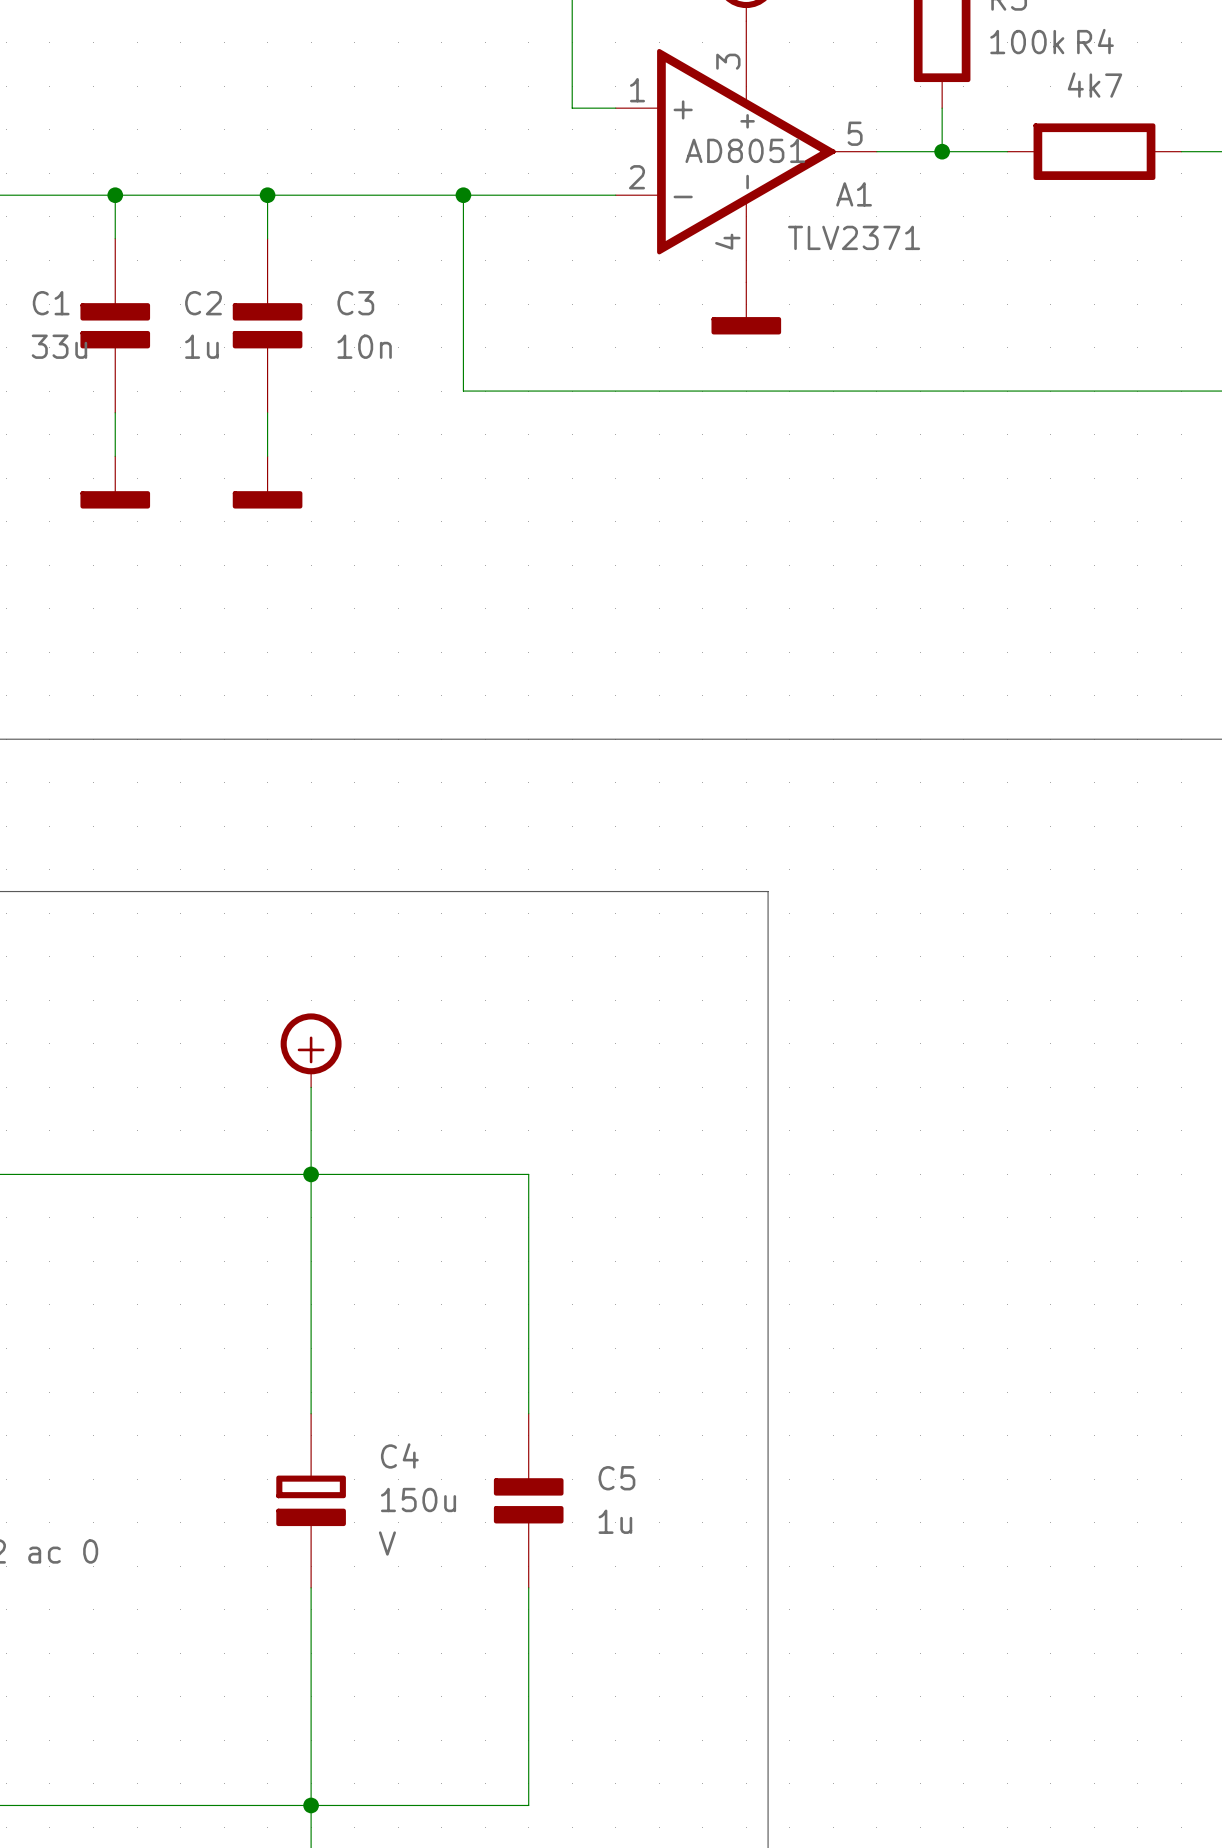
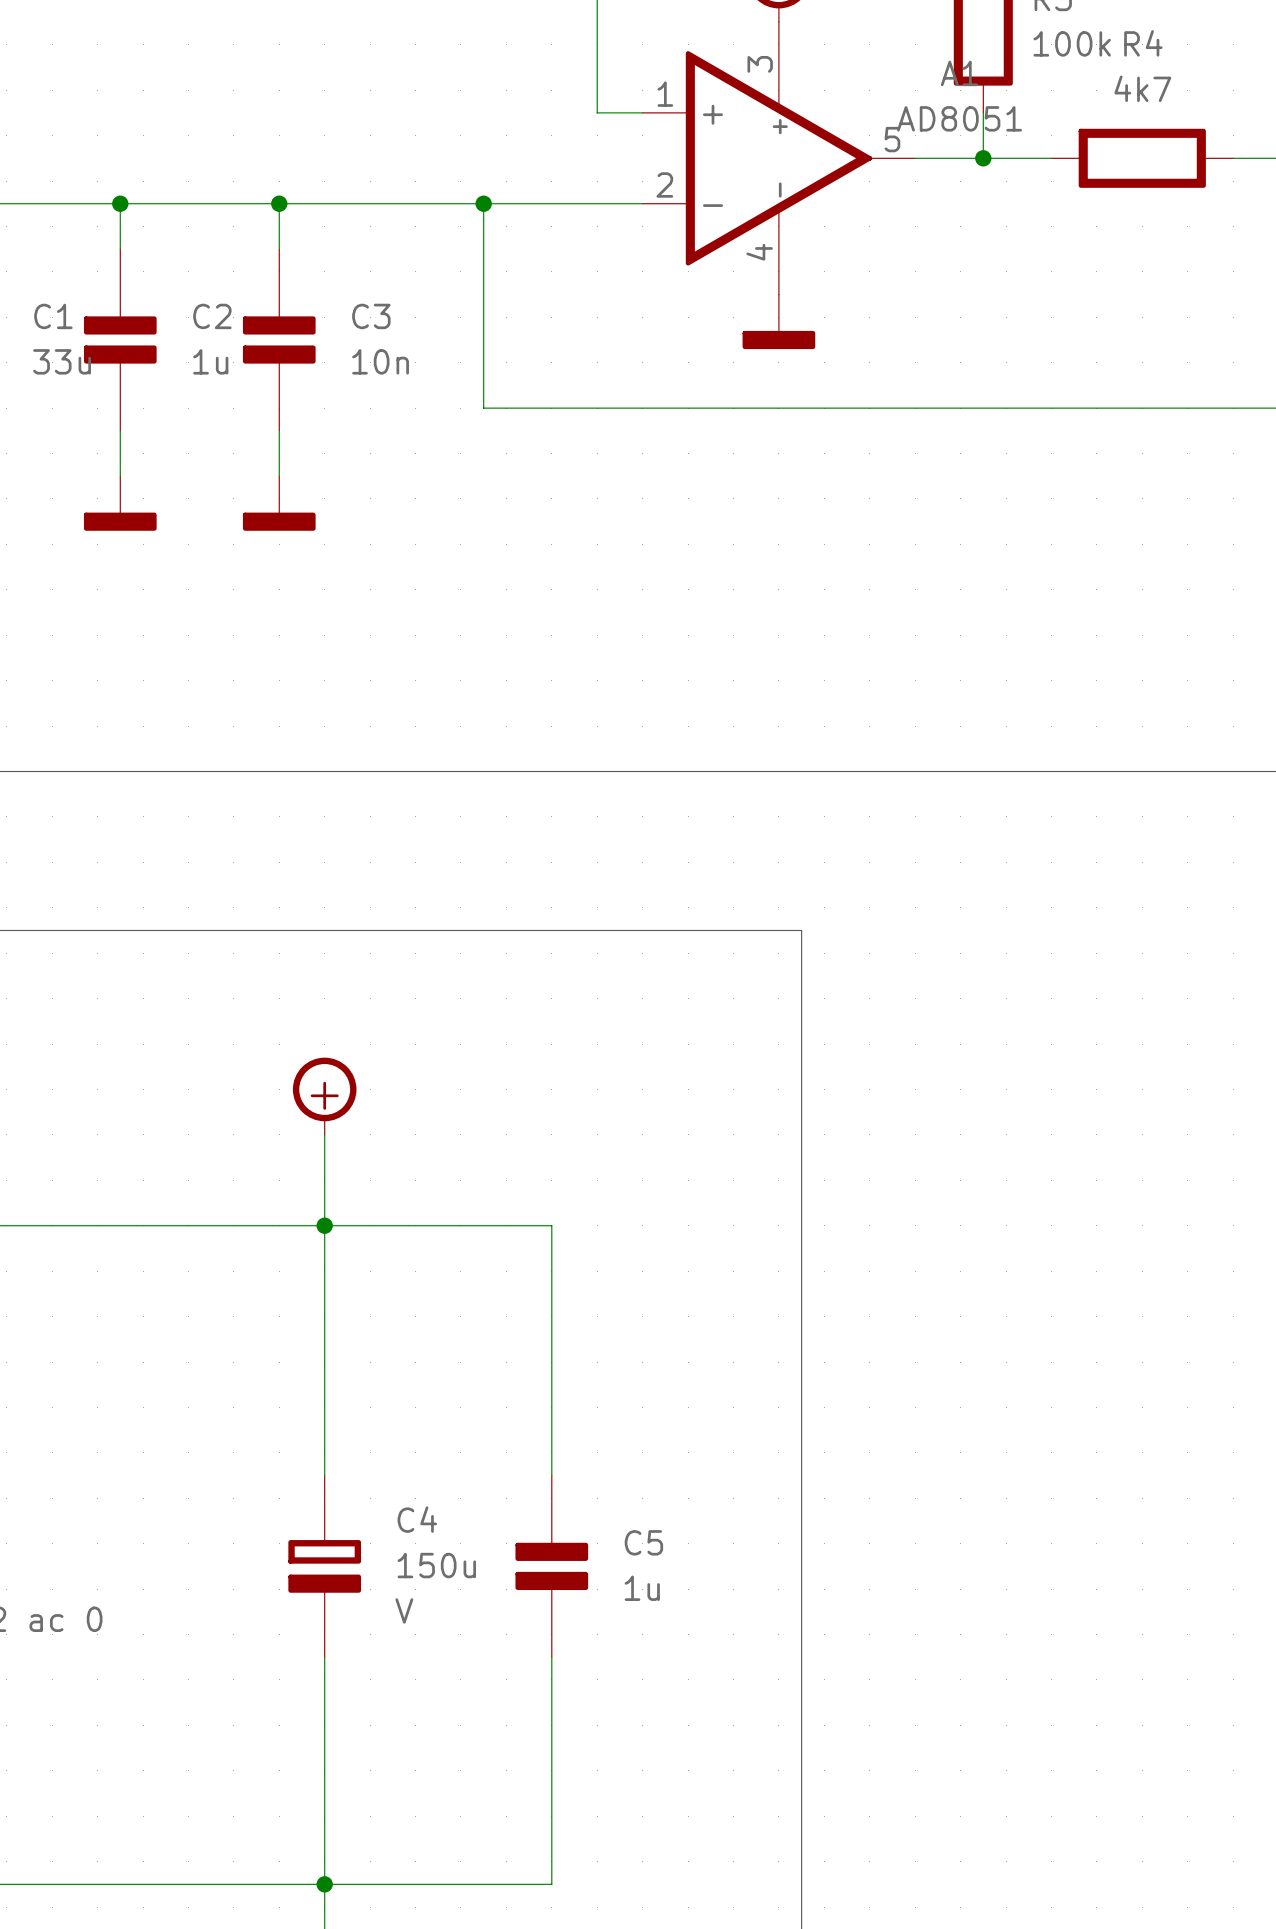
A1 text: AD8051 (745, 150) -> none
A1 name position: A1 (854, 194) -> A1 (959, 73)
A1 value: TLV2371 (854, 237) -> AD8051 (959, 118)

